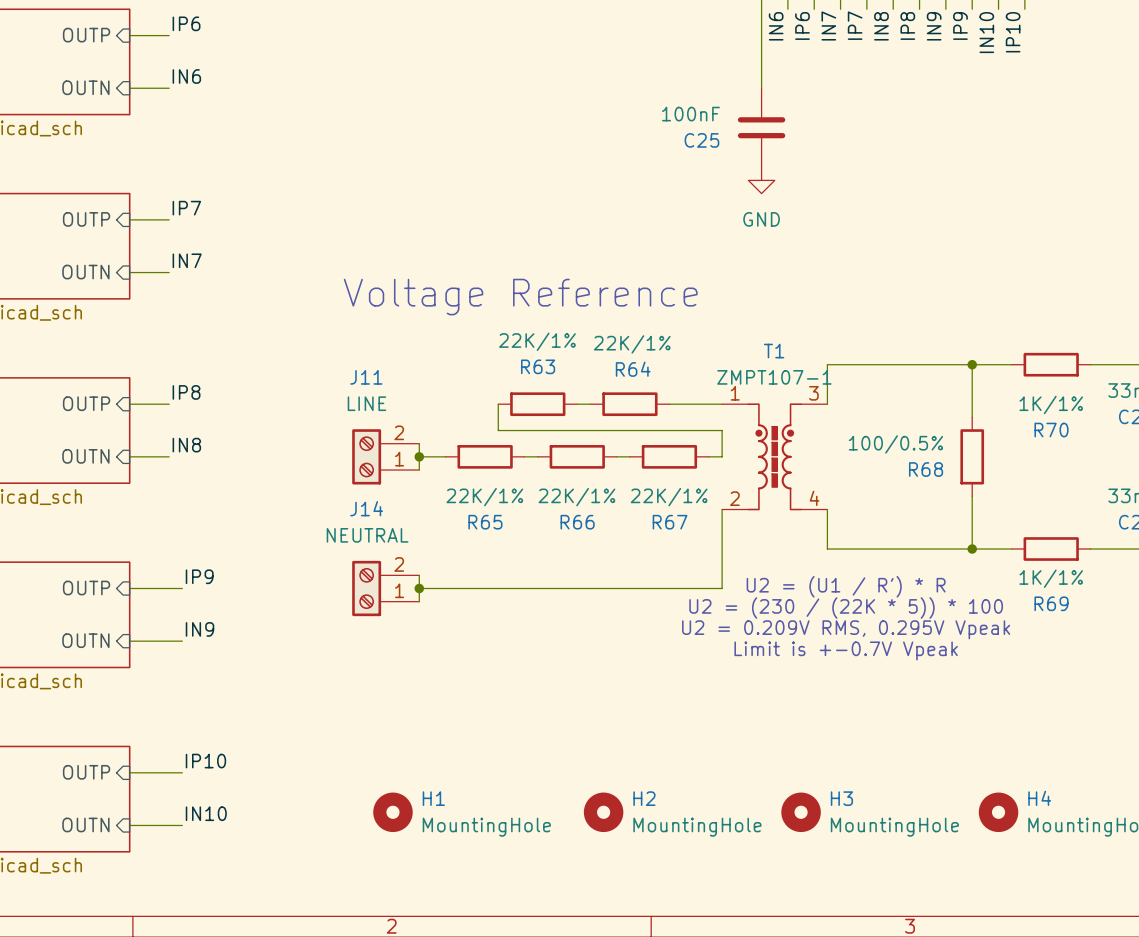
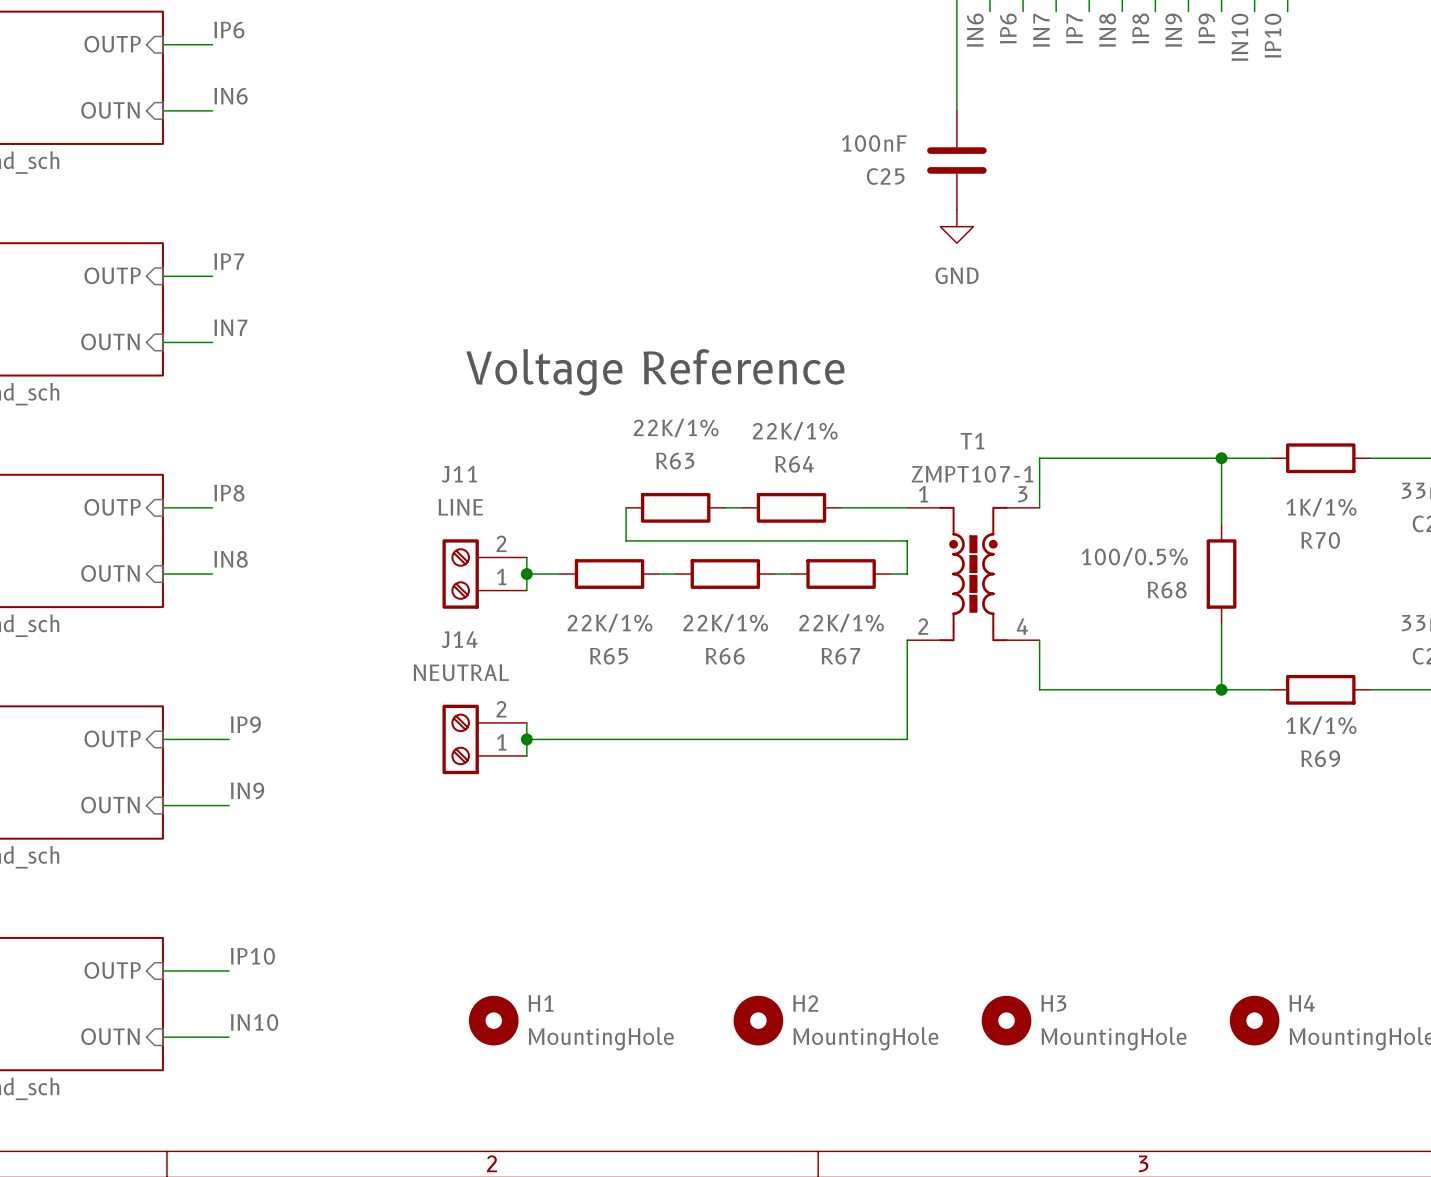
text: U2 = (U1 / R') * R (846, 586) -> none
text: U2 = (230 / (22K * 5)) * 100 (846, 607) -> none
text: U2 = 0.209V RMS, 0.295V Vpeak (846, 629) -> none
text: Limit is +-0.7V Vpeak (846, 651) -> none

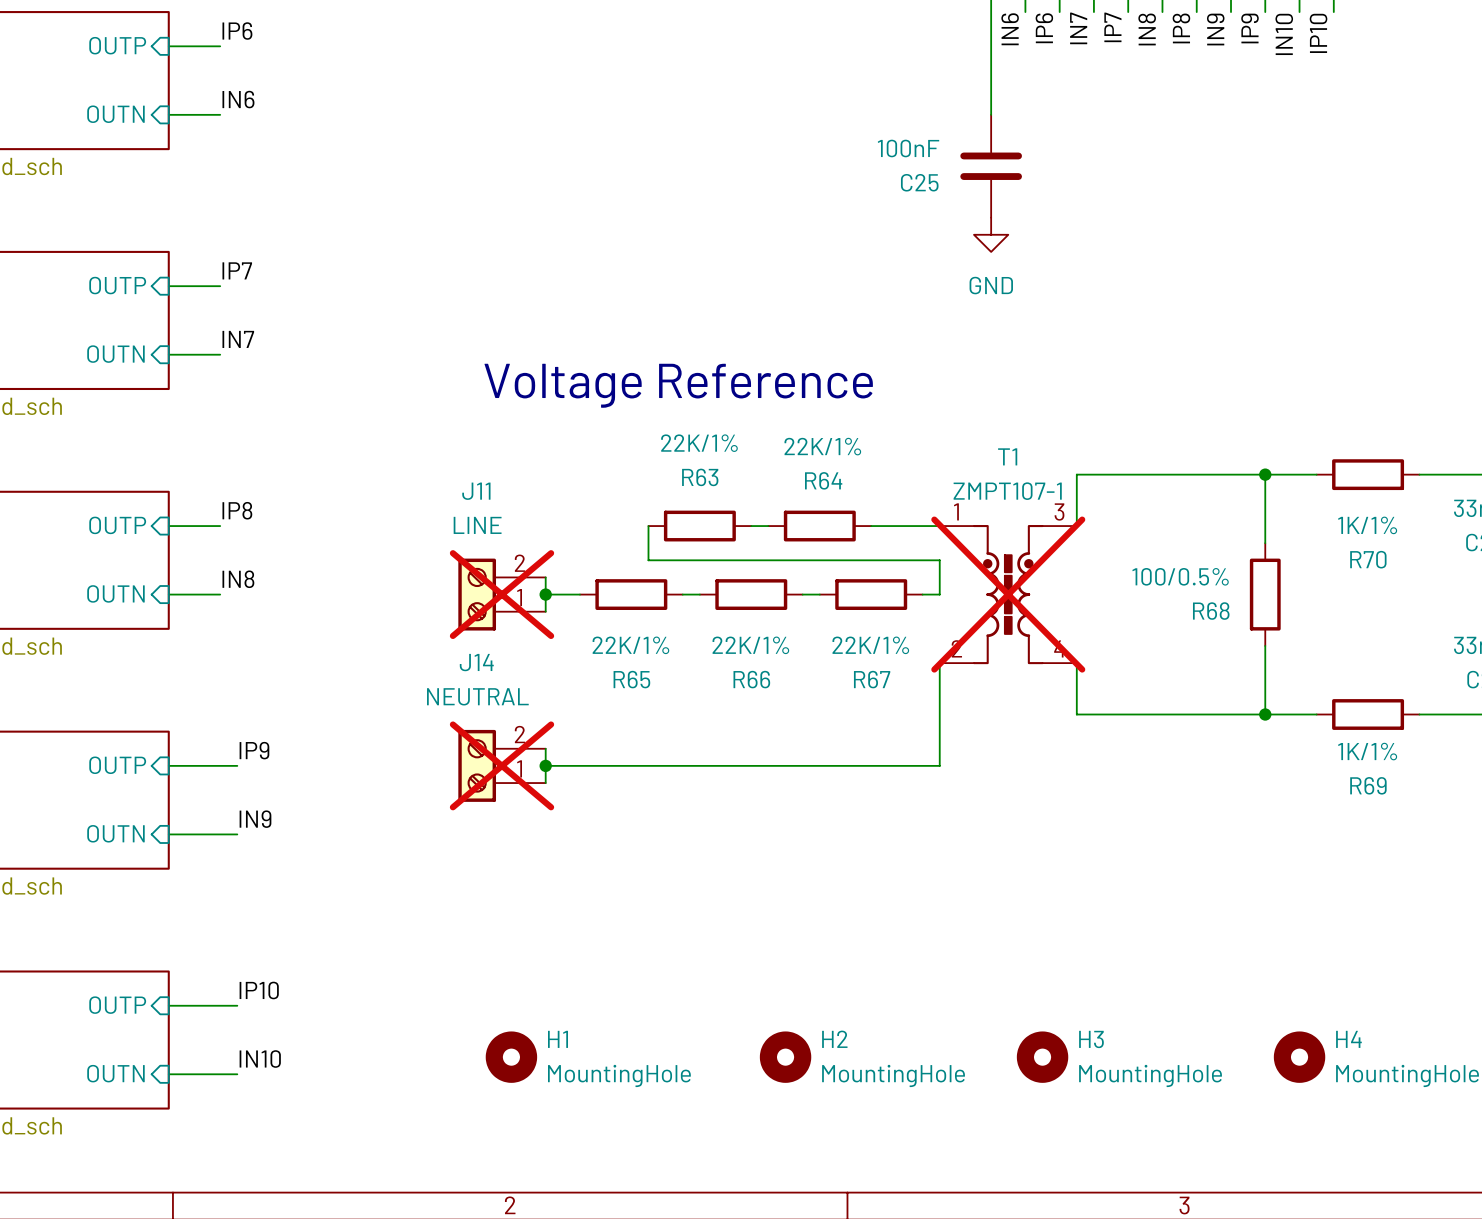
J11 do-not-place cross: none -> (502, 594)
T1 do-not-place cross: none -> (1008, 594)
J14 do-not-place cross: none -> (502, 765)

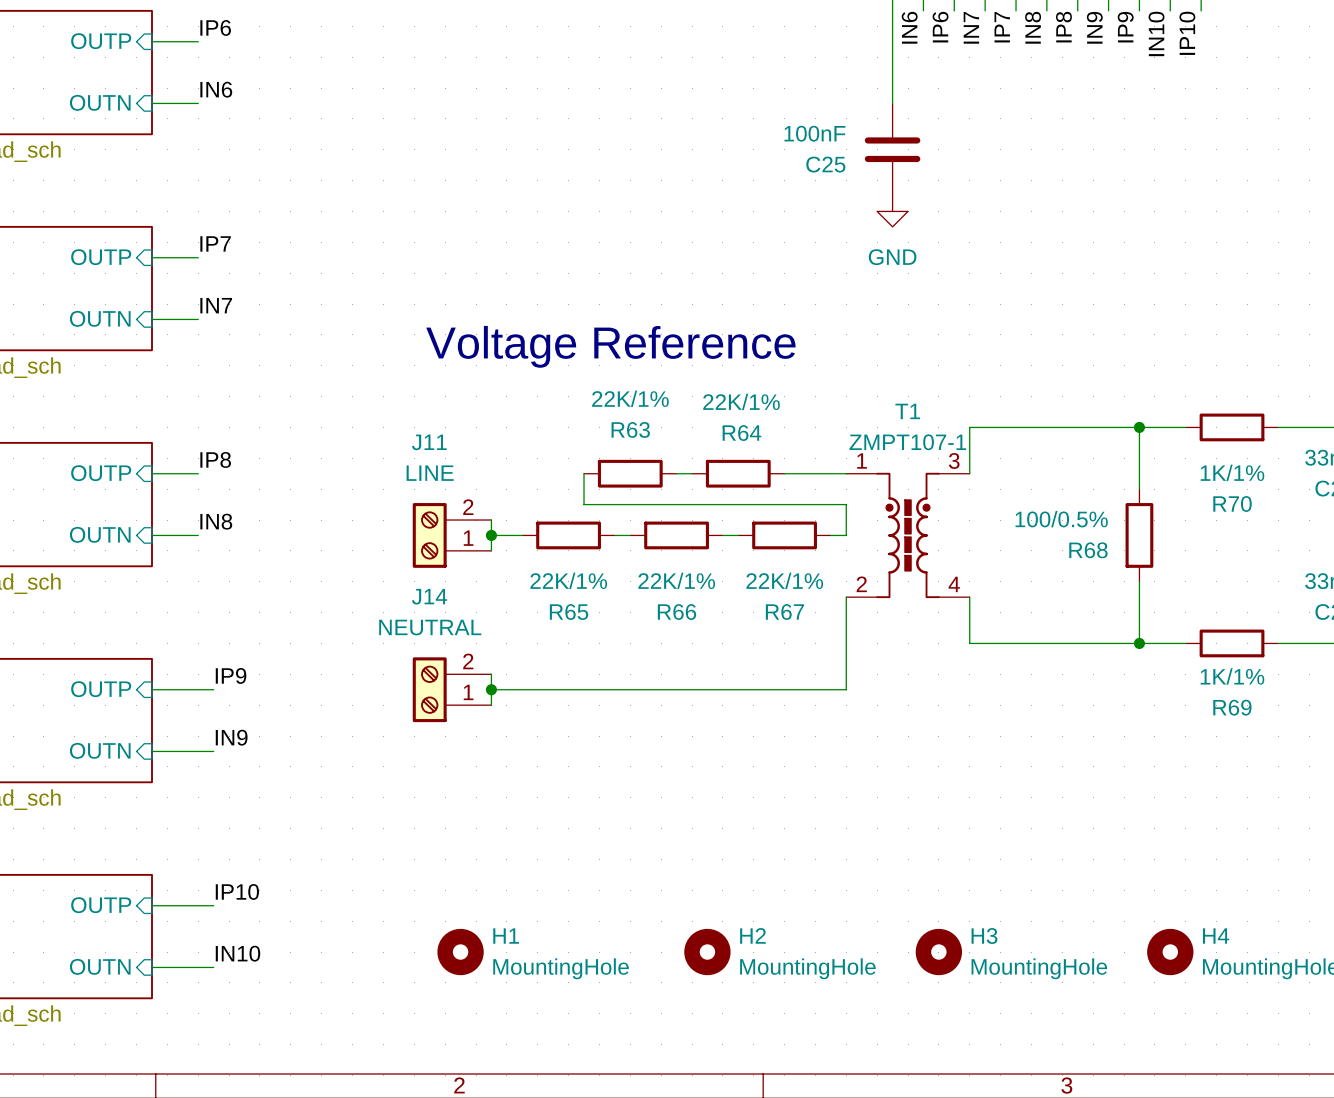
J11 do-not-place cross: (502, 594) -> none
T1 do-not-place cross: (1008, 594) -> none
J14 do-not-place cross: (502, 765) -> none

